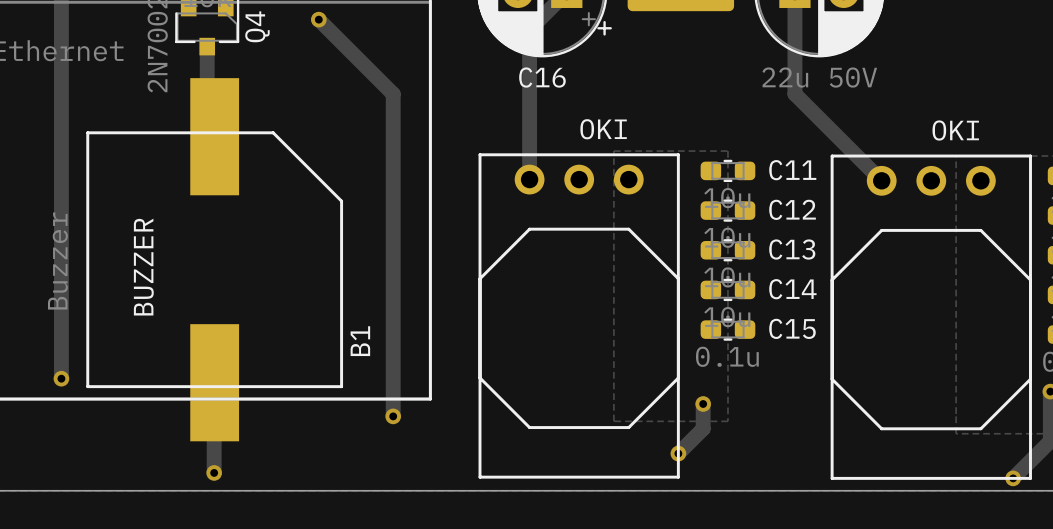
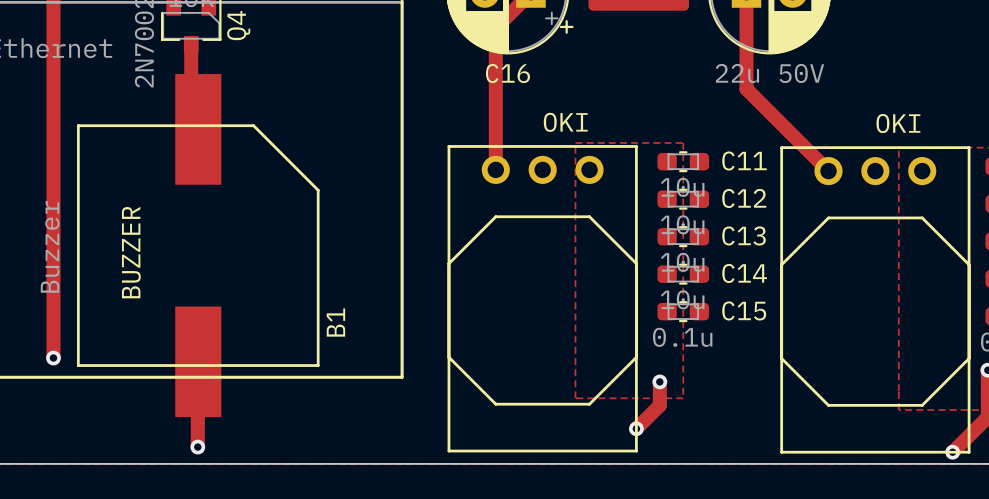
track: (318, 19) (393, 94) (393, 416) -> none
via: (318, 19) -> none
via: (393, 416) -> none

